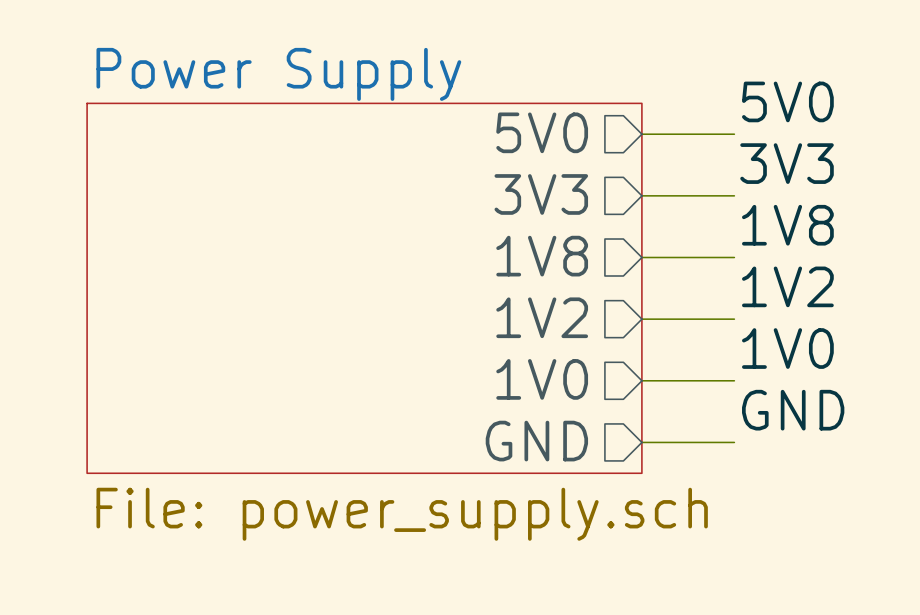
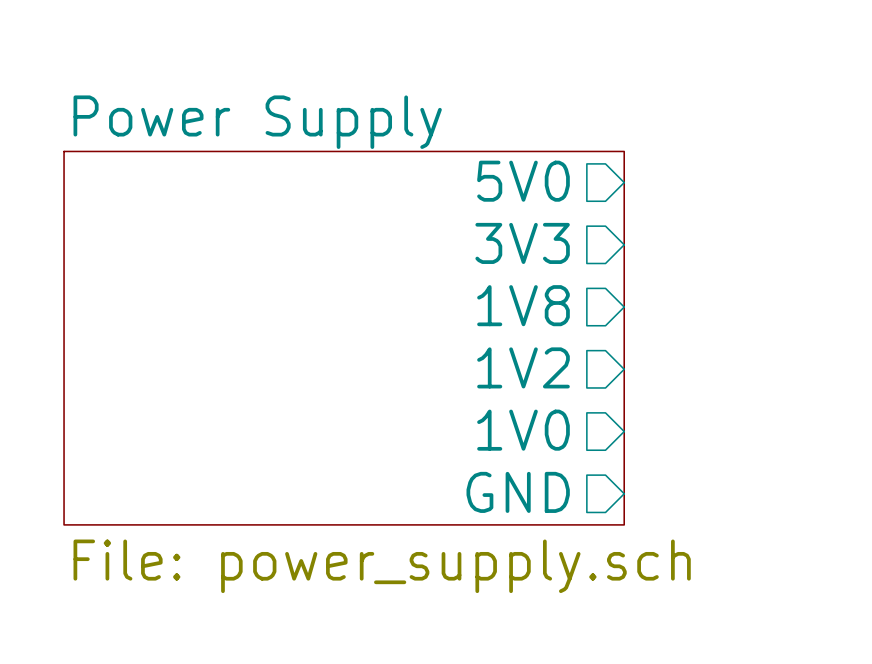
label: 5V0 (787, 101) -> none
wire: (641, 134) (734, 134) -> none
label: 3V3 (787, 163) -> none
wire: (641, 195) (734, 195) -> none
label: 1V8 (787, 225) -> none
wire: (641, 257) (734, 257) -> none
label: 1V2 (787, 286) -> none
wire: (641, 319) (734, 319) -> none
label: 1V0 (787, 348) -> none
wire: (641, 380) (734, 380) -> none
label: GND (793, 410) -> none
wire: (641, 442) (734, 442) -> none

